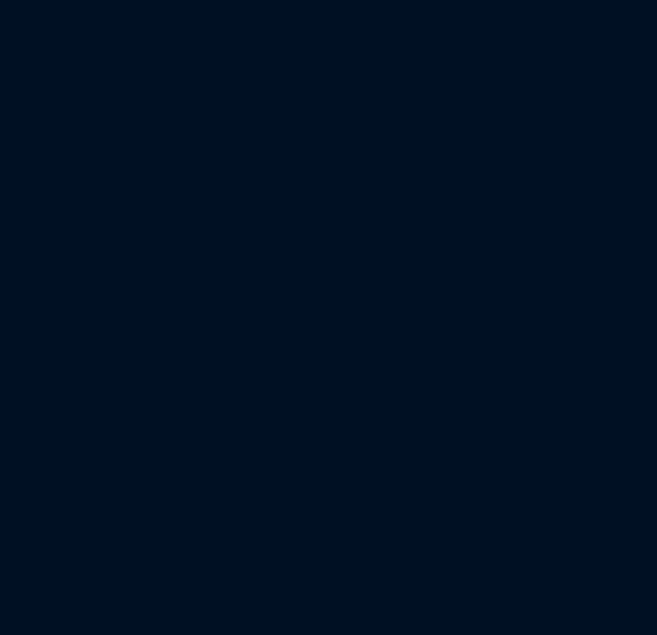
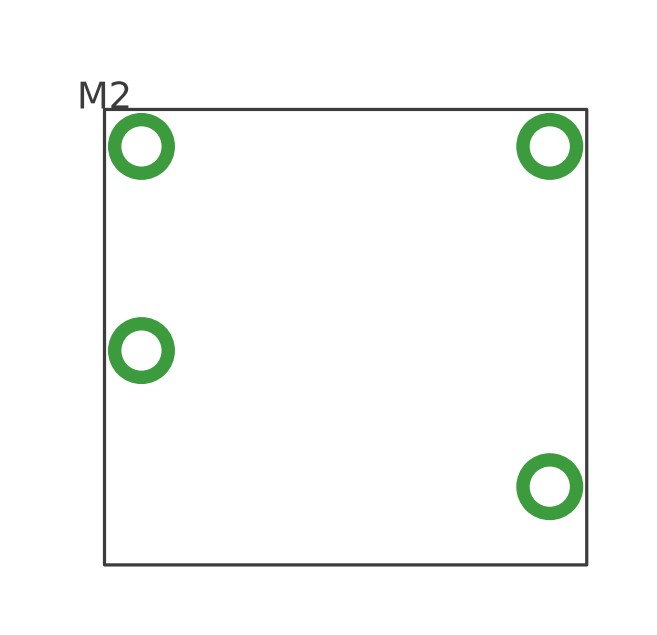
M2: none -> (345, 337)

